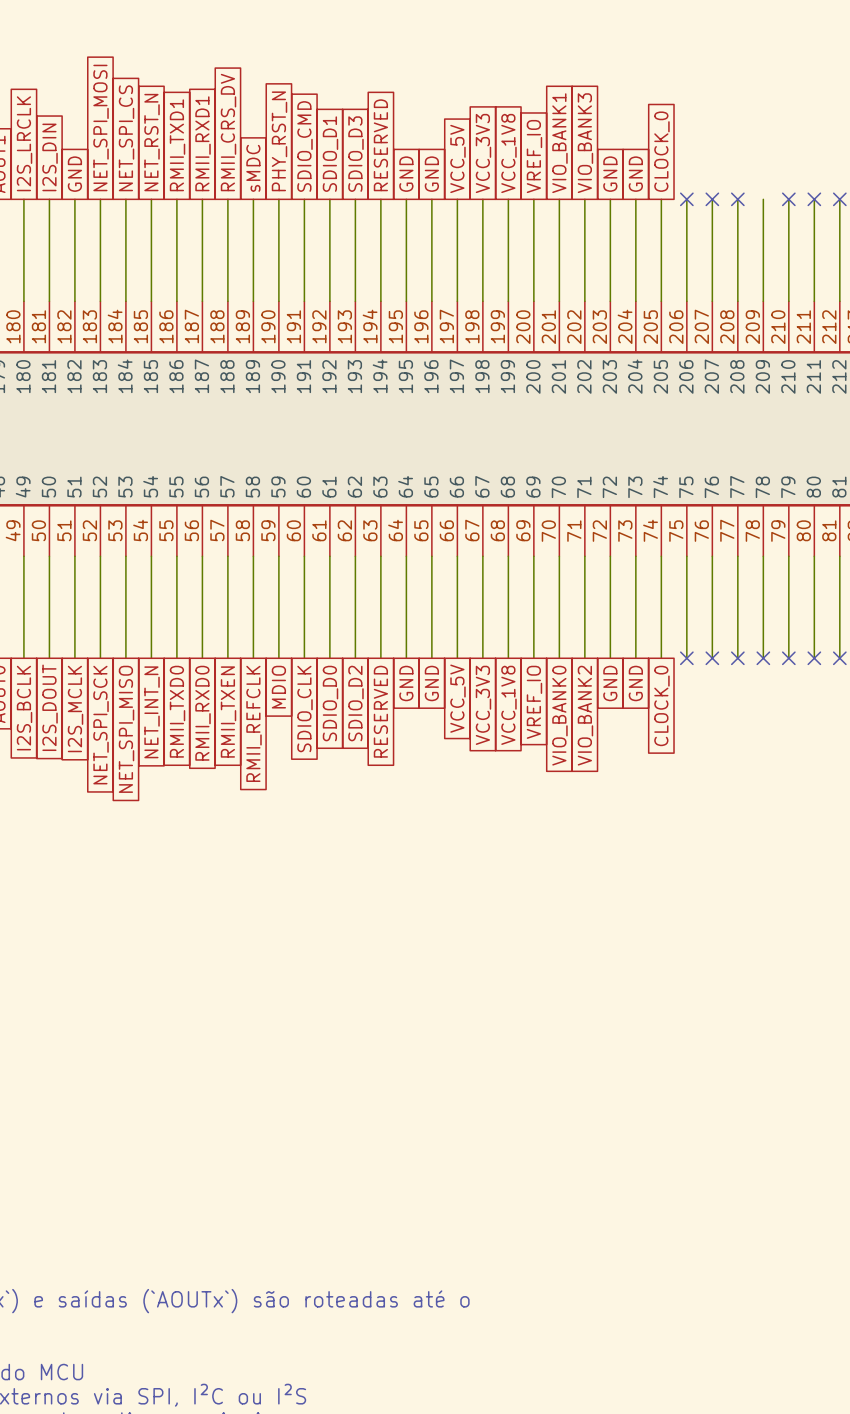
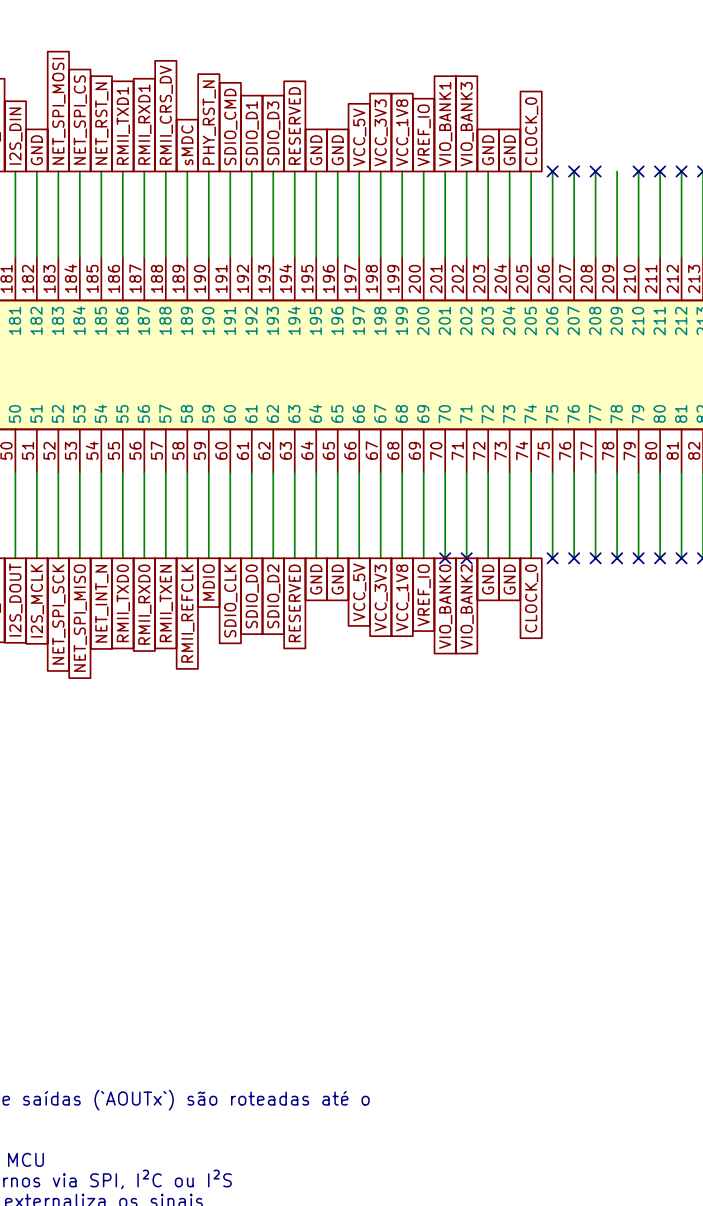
no-connect mark: none -> (445, 558)
no-connect mark: none -> (466, 558)

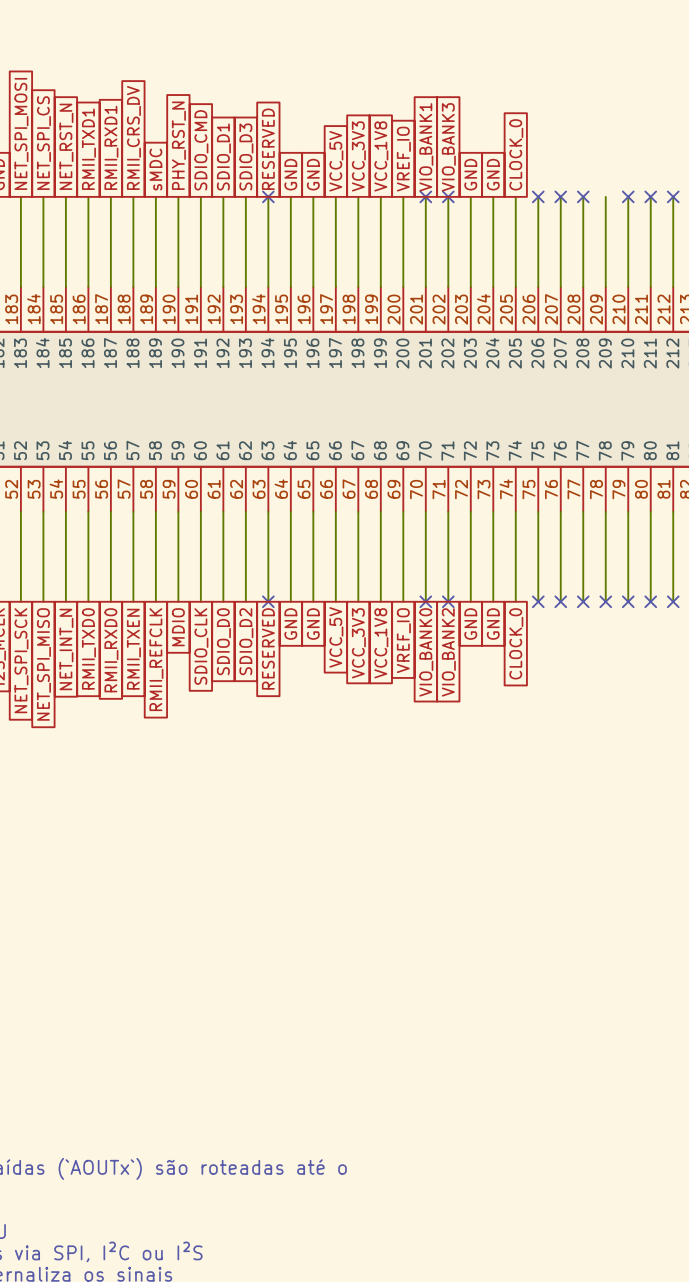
no-connect mark: none -> (268, 196)
no-connect mark: none -> (425, 196)
no-connect mark: none -> (448, 196)
no-connect mark: none -> (268, 601)

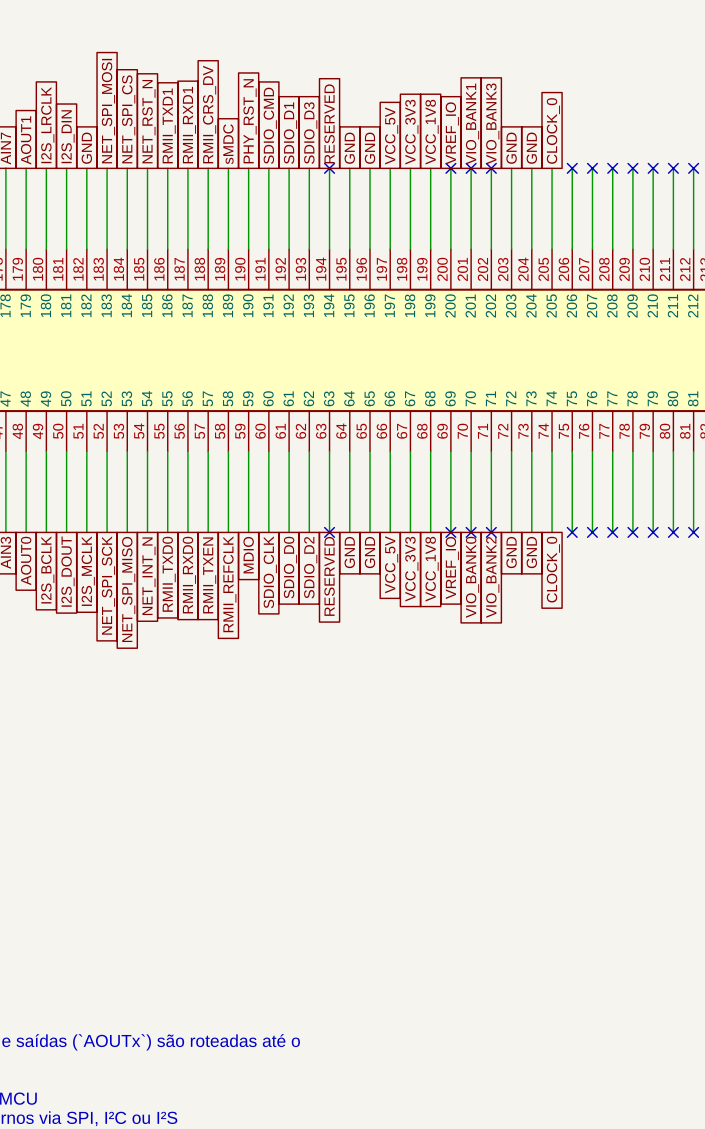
no-connect mark: none -> (450, 168)
no-connect mark: none -> (632, 168)
no-connect mark: none -> (450, 532)

